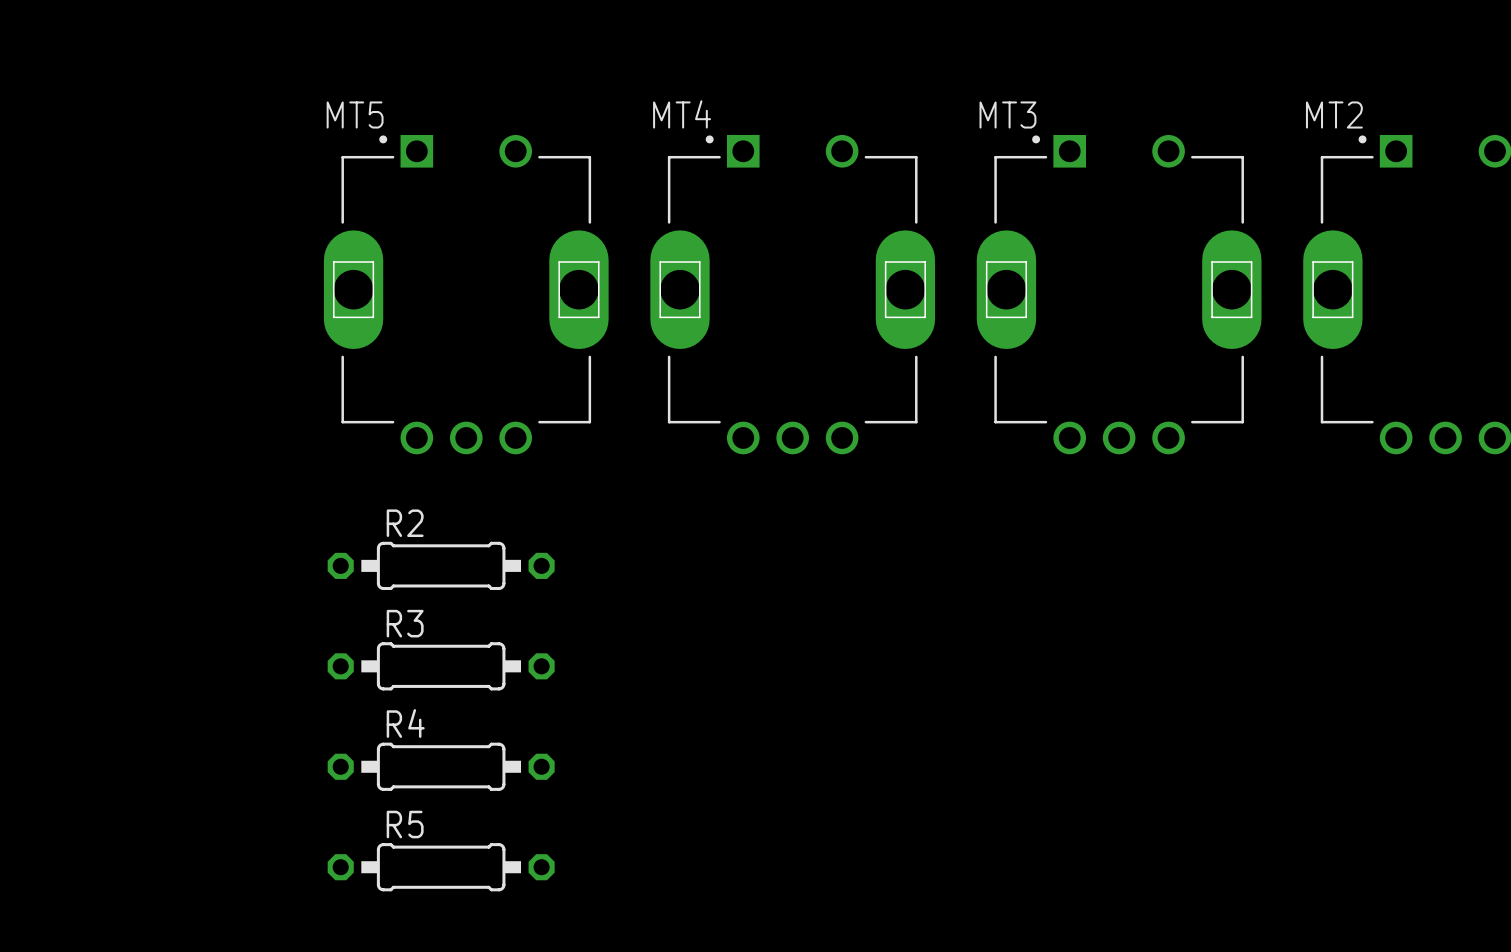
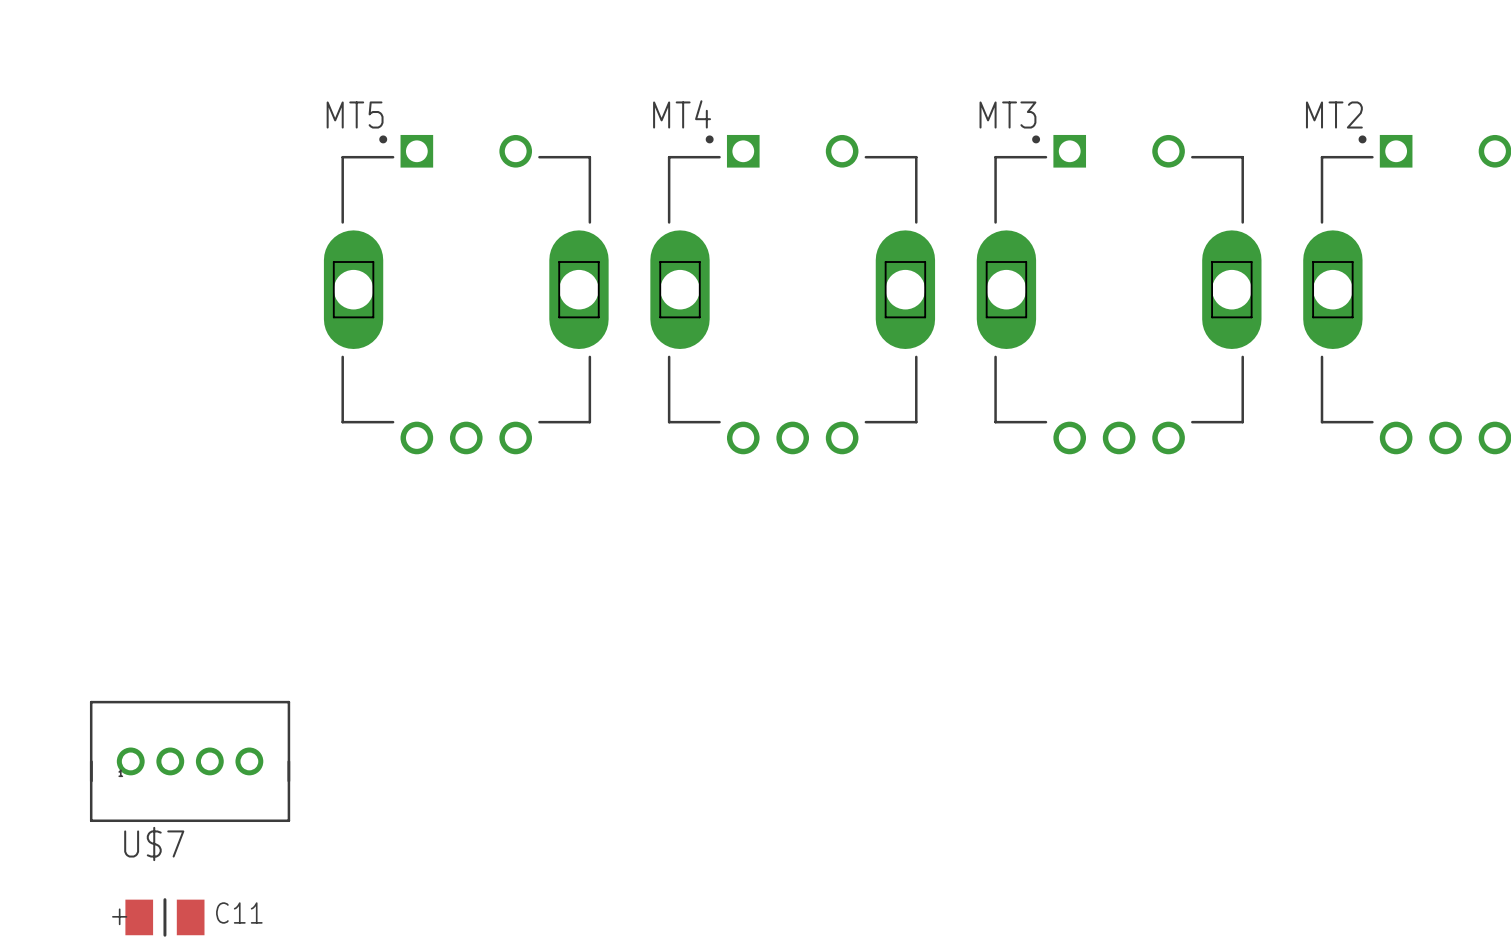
R2: (441, 565) -> none
R3: (441, 666) -> none
U$7: none -> (190, 761)
R4: (441, 766) -> none
R5: (441, 867) -> none
C11: none -> (164, 917)

